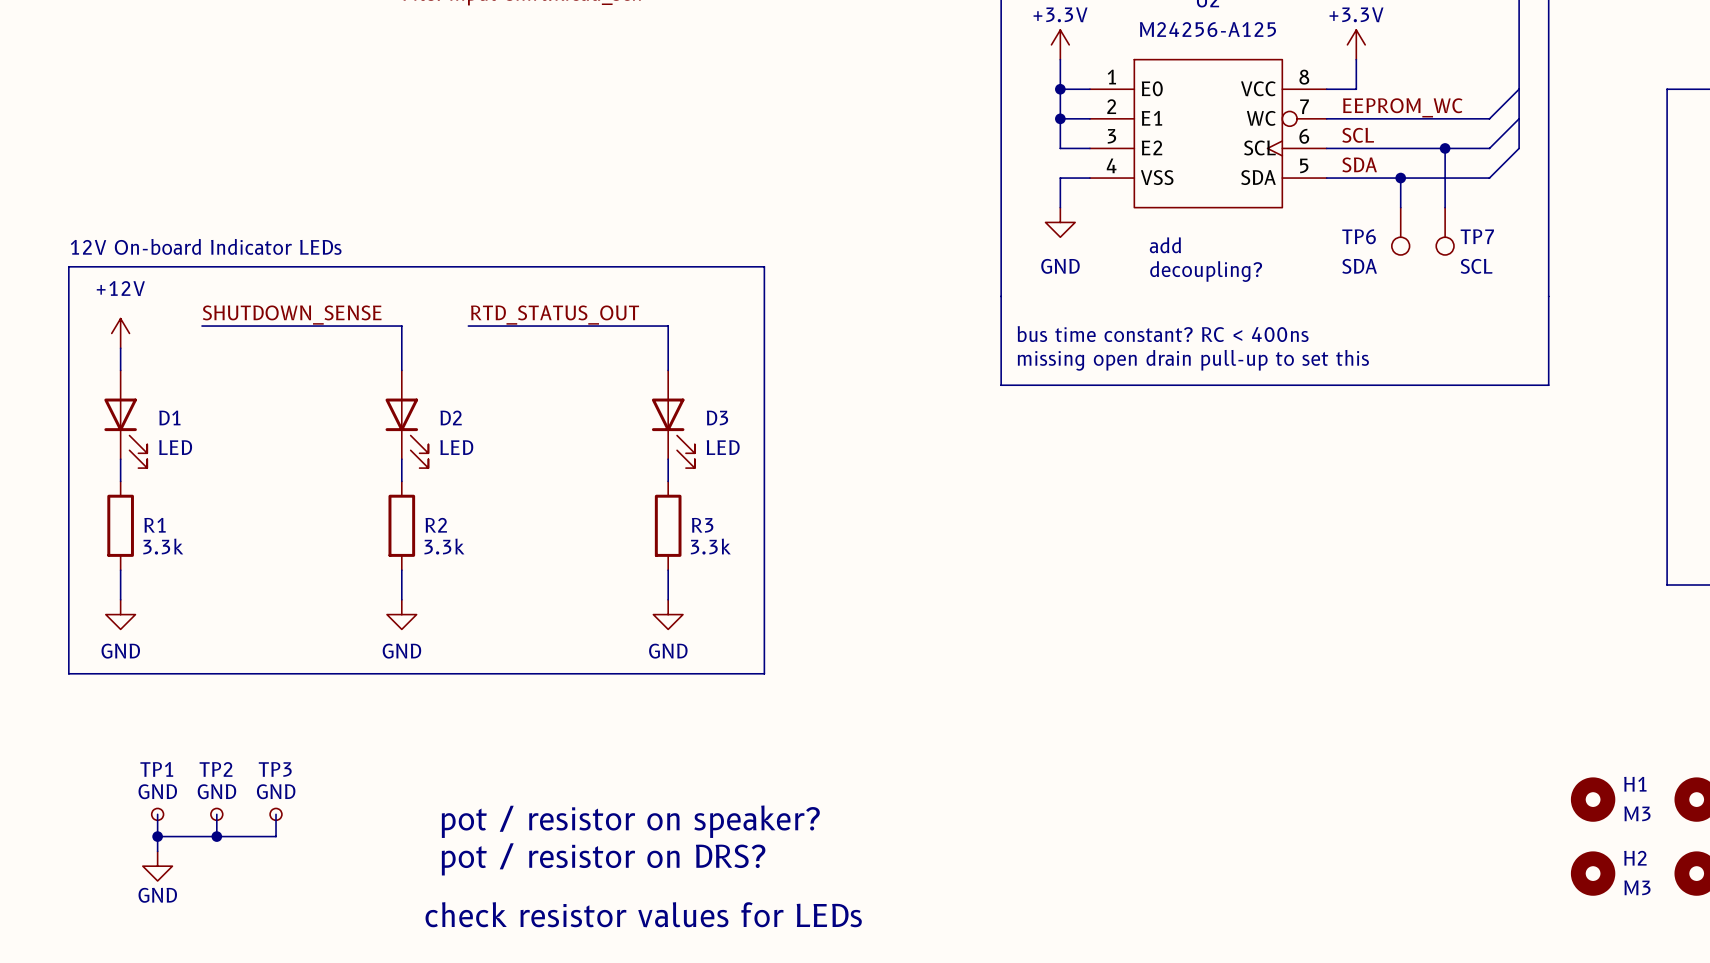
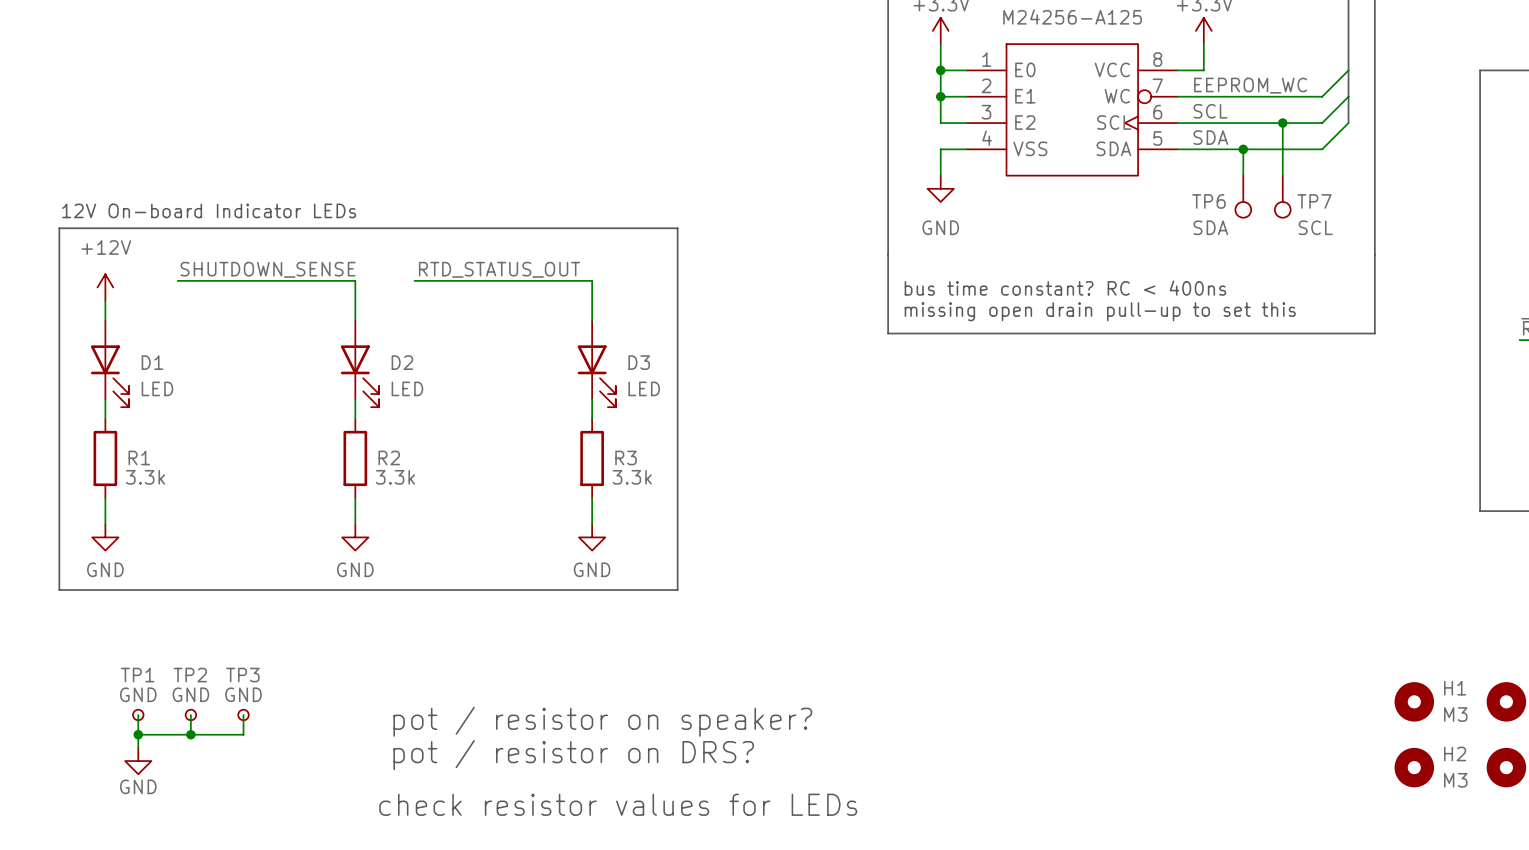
text: add (1165, 245) -> none
text: decoupling? (1206, 271) -> none

